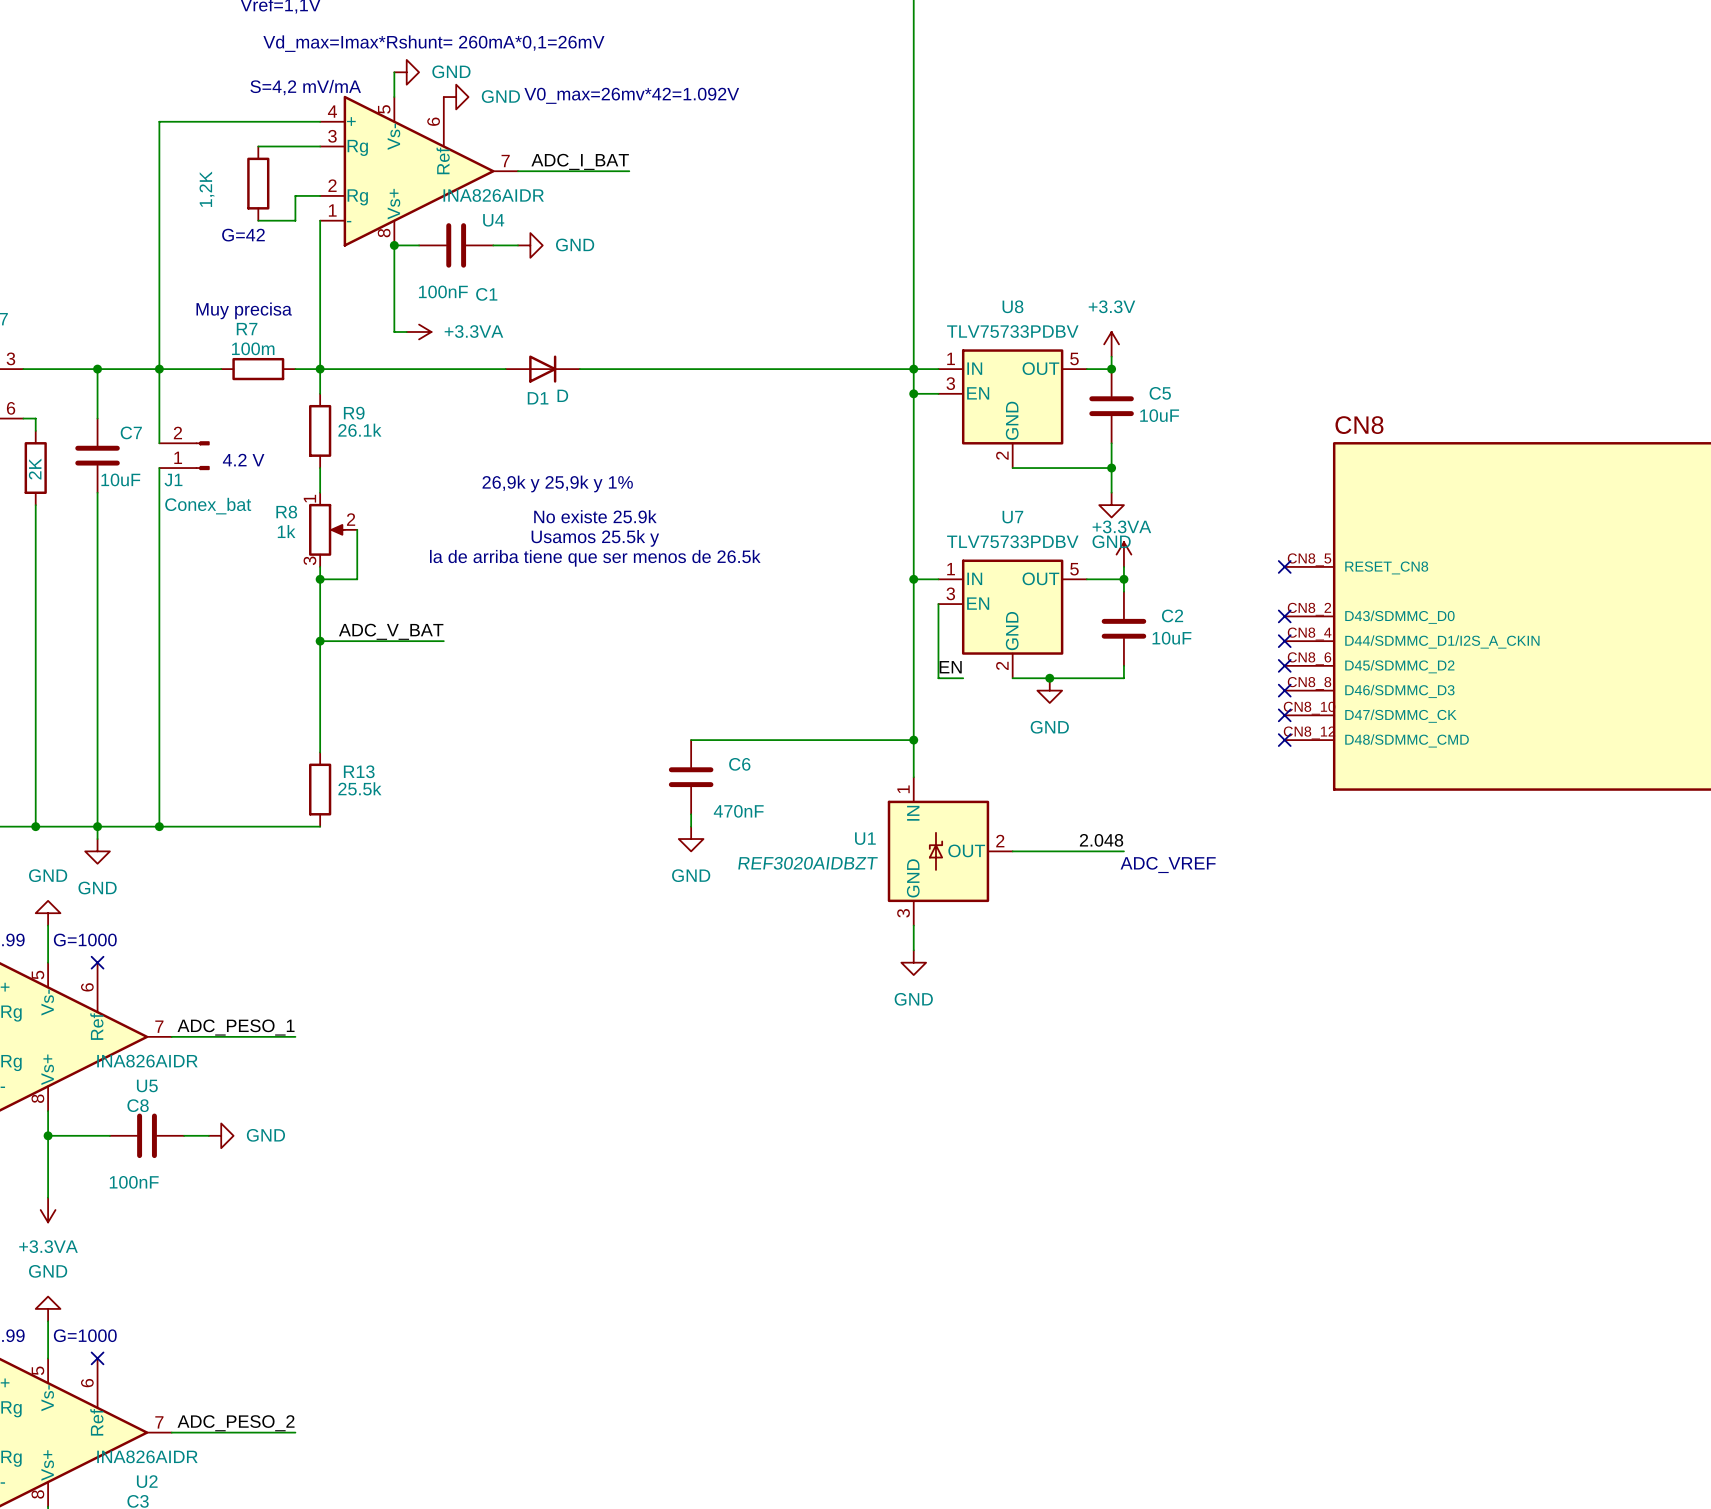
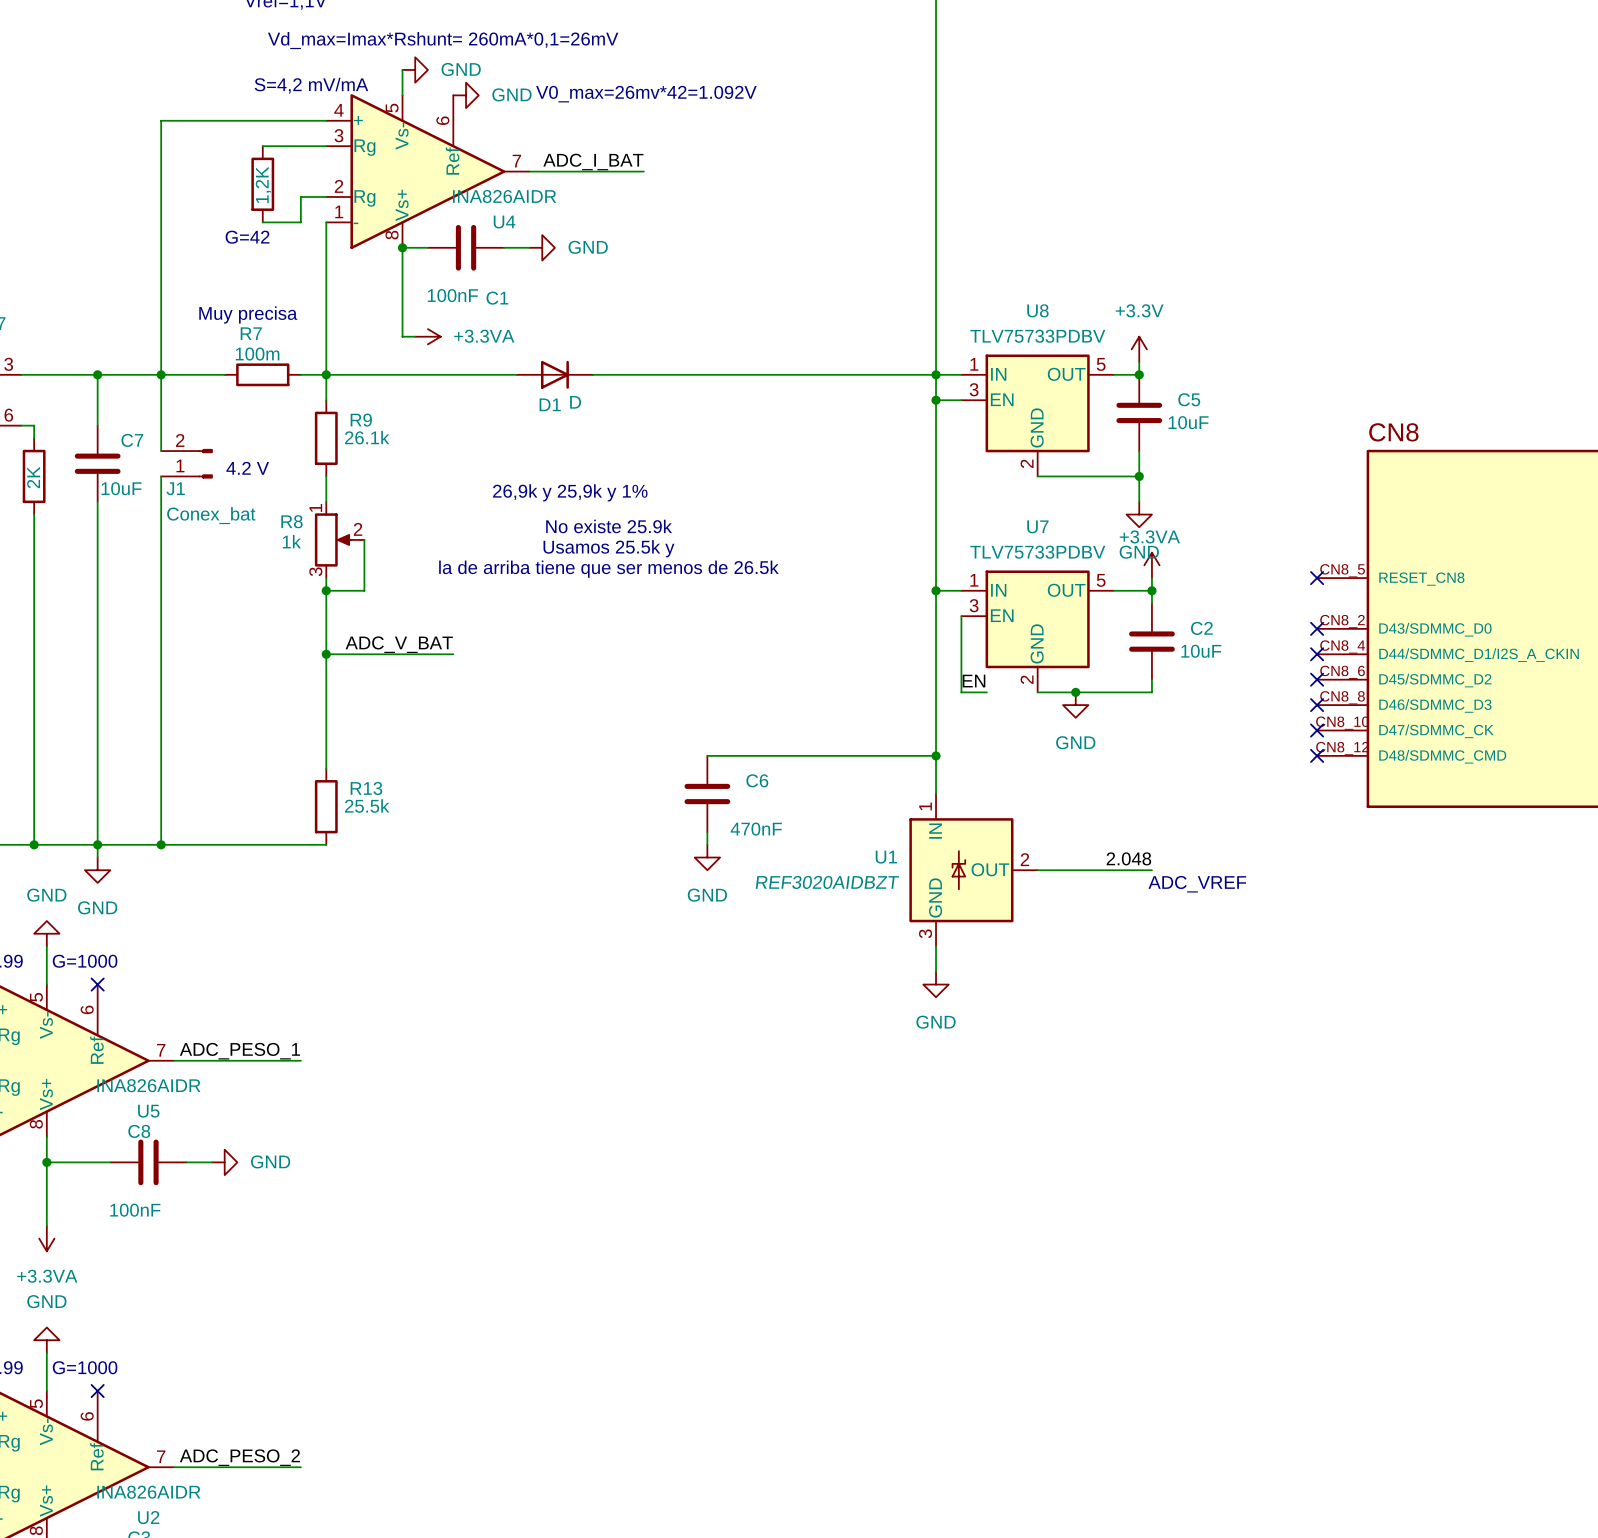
part value position: 1,2K (206, 189) -> 1,2K (263, 185)

